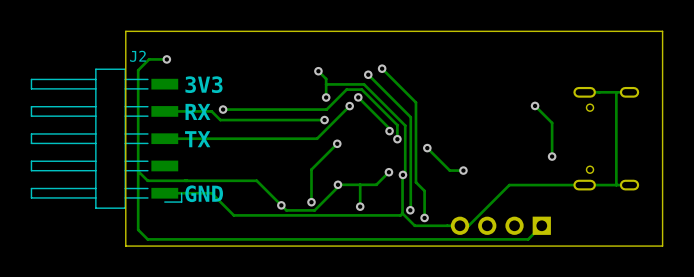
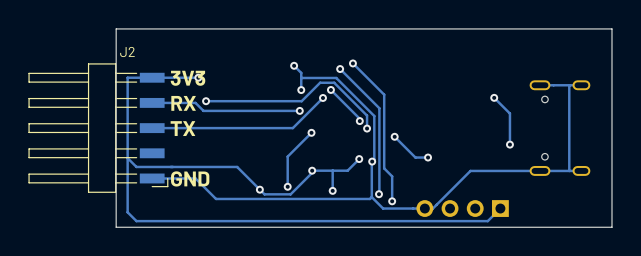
track: (166, 59) (149, 59) (138, 70) (138, 84) -> (198, 77) (127, 77)
via position: (166, 59) -> (198, 77)

